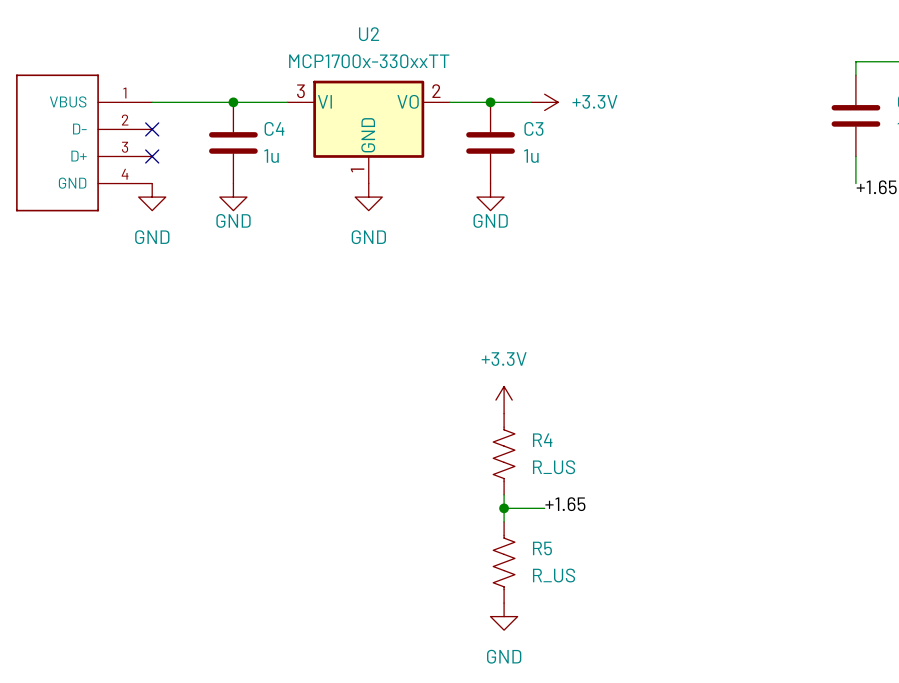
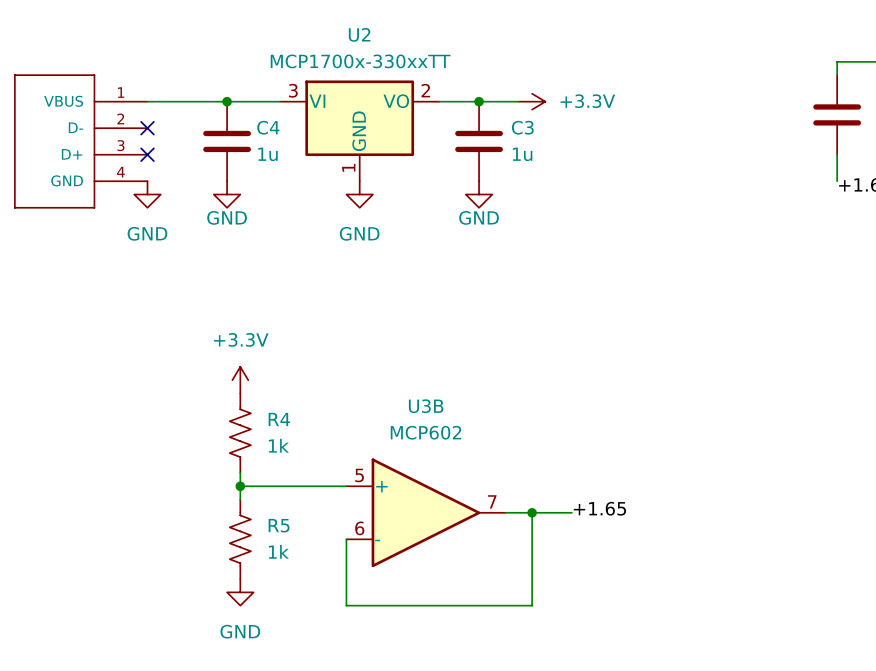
power symbol position: +3.3V (504, 400) -> +3.3V (240, 380)
R4 position: (504, 454) -> (240, 433)
R4 value: R_US (554, 467) -> 1k (278, 445)
wire: none -> (240, 486) (346, 486)
junction: none -> (240, 486)
wire: (504, 494) (504, 521) -> (240, 473) (240, 499)
label position: +1.65 (565, 504) -> +1.65 (599, 508)
wire: (504, 508) (544, 508) -> none
junction position: (504, 508) -> (532, 512)
U3B: none -> MCP602 (426, 512)
wire: none -> (505, 512) (571, 512)
wire: none -> (532, 512) (532, 605) (346, 605) (346, 539)
R5 position: (504, 562) -> (240, 539)
R5 value: R_US (554, 575) -> 1k (278, 551)
power symbol position: GND (504, 616) -> GND (240, 592)

